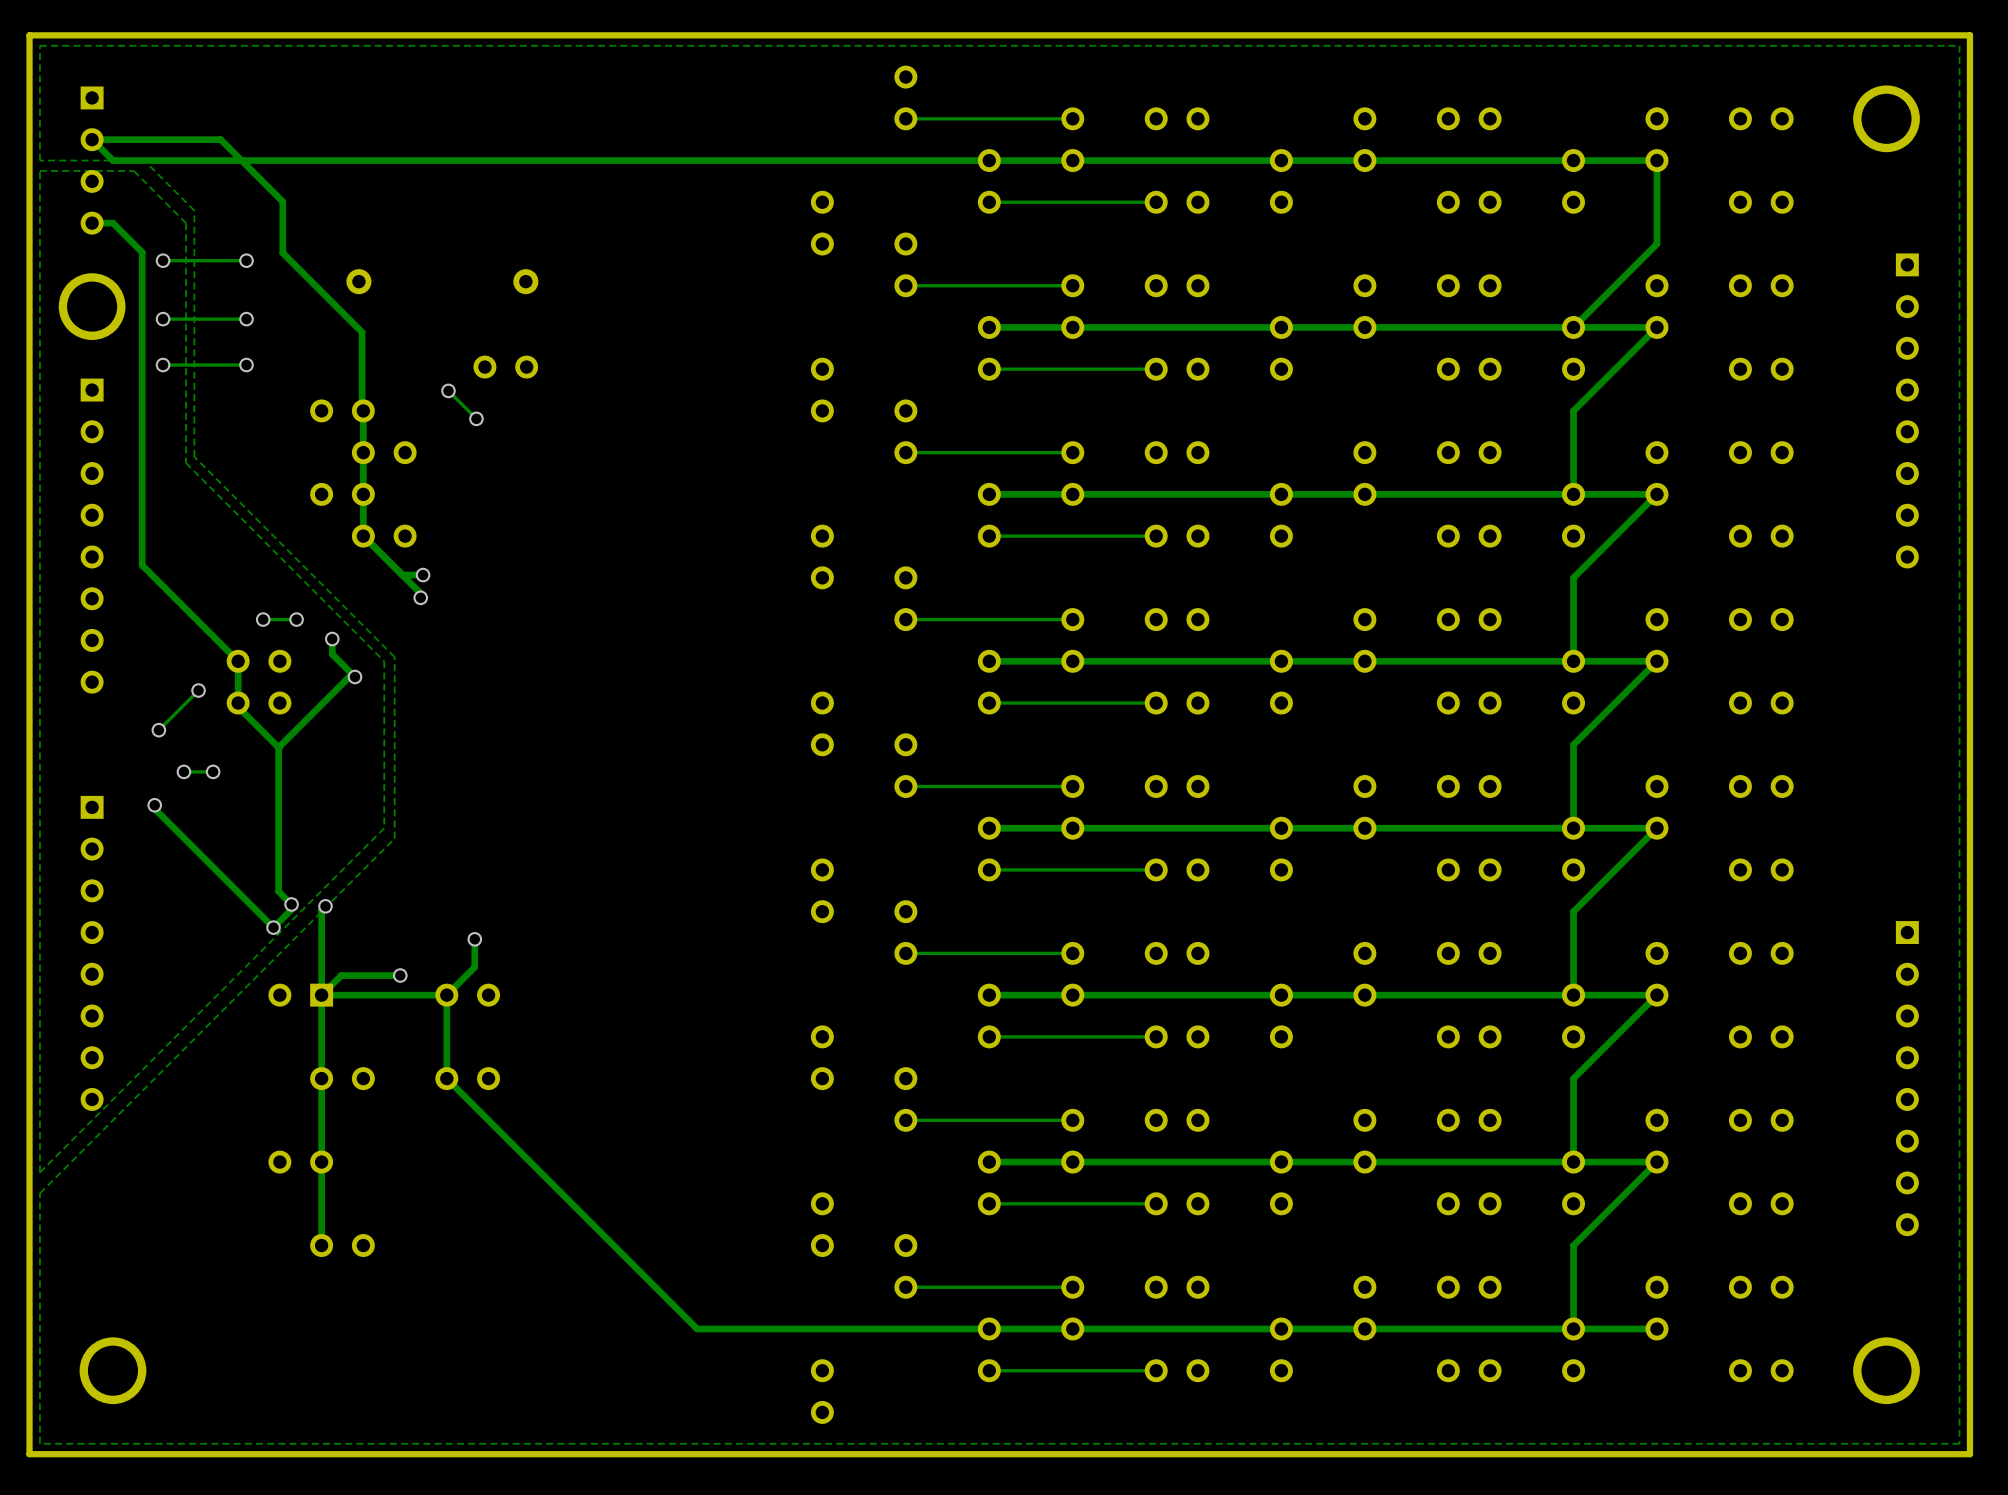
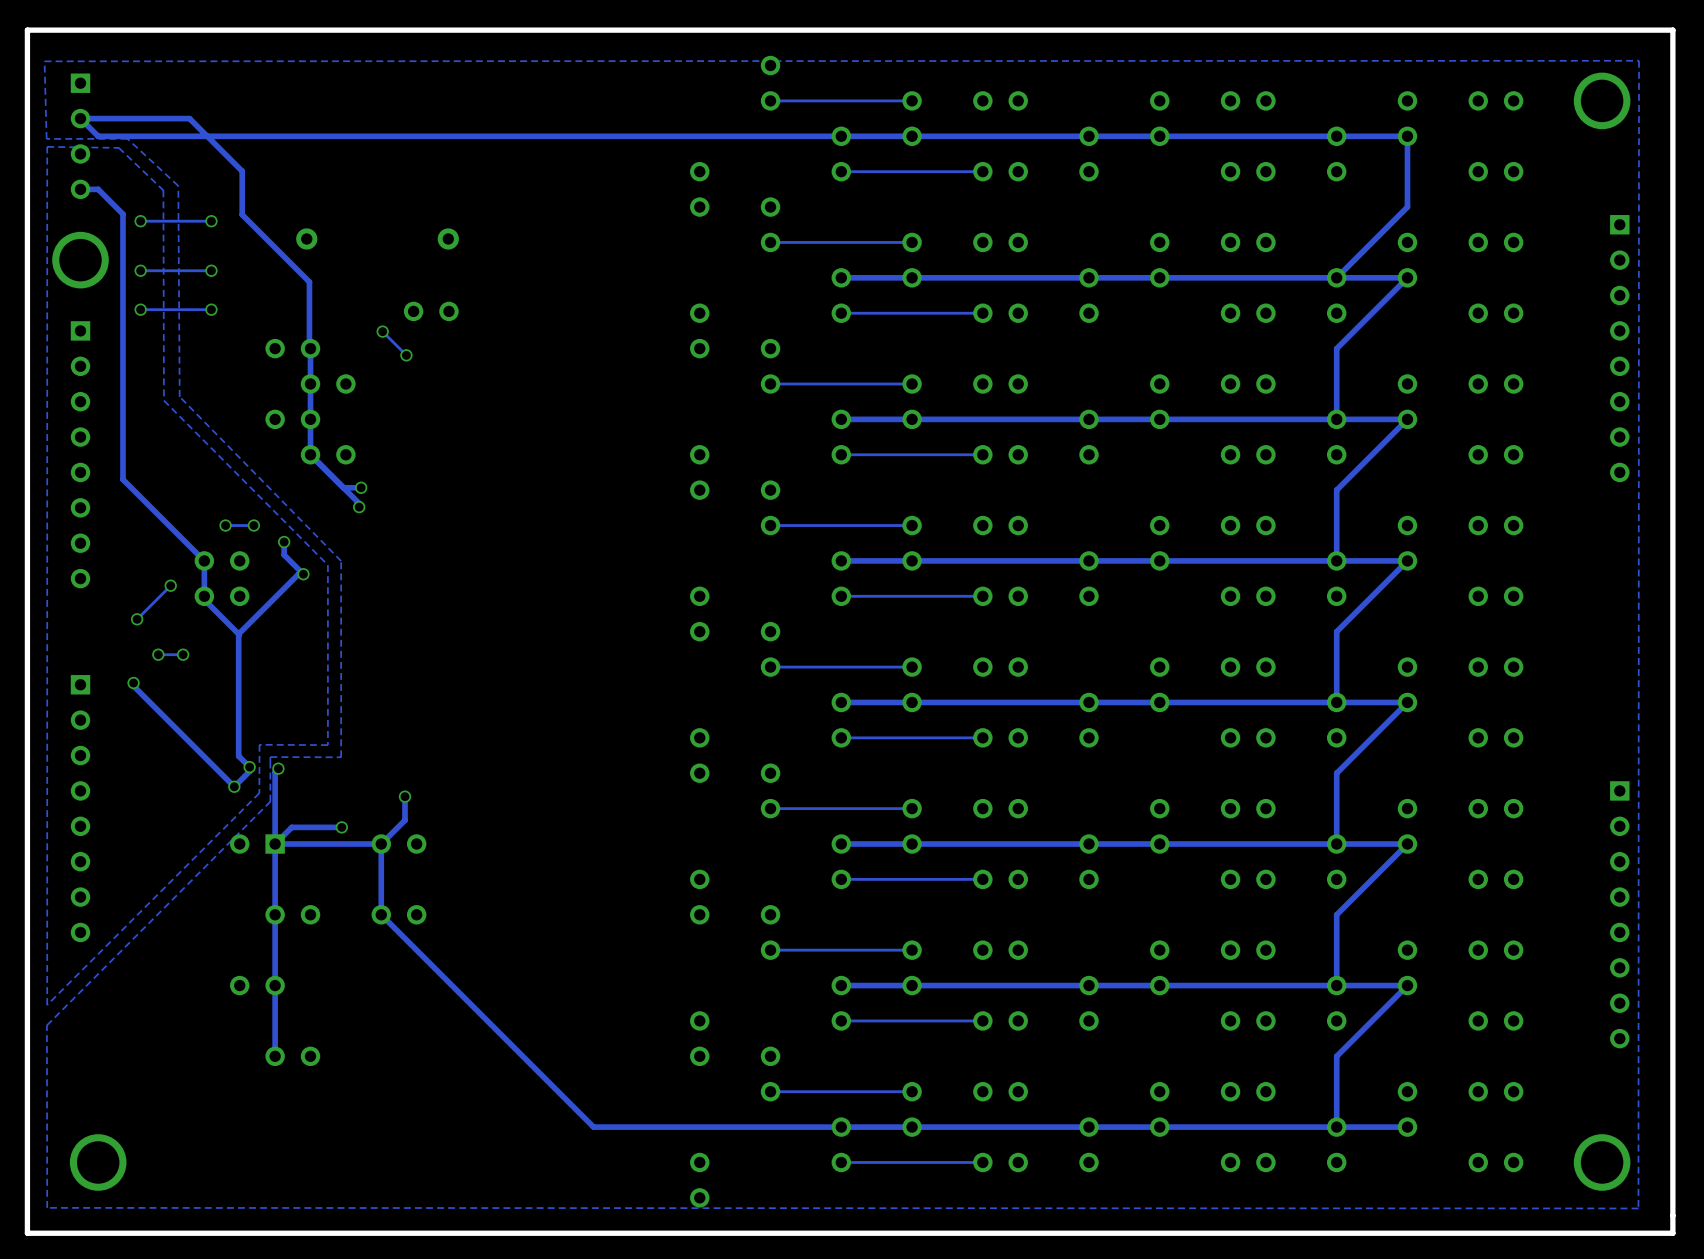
zone outline: (1959, 45) (39, 45) (39, 160) (144, 160) (194, 210) (194, 456) (394, 657) (394, 838) (39, 1193) (39, 1443) (1959, 1443) (1959, 45) -> (1639, 60) (1638, 1208) (47, 1207) (46, 1025) (270, 801) (270, 757) (341, 757) (341, 561) (179, 396) (178, 185) (127, 138) (46, 138) (44, 61) (1639, 60)
zone outline: (133, 170) (39, 170) (39, 1172) (384, 828) (384, 661) (186, 463) (186, 223) (133, 170) -> (47, 146) (118, 147) (163, 190) (163, 400) (327, 565) (327, 745) (259, 744) (259, 793) (47, 1005) (47, 146)

